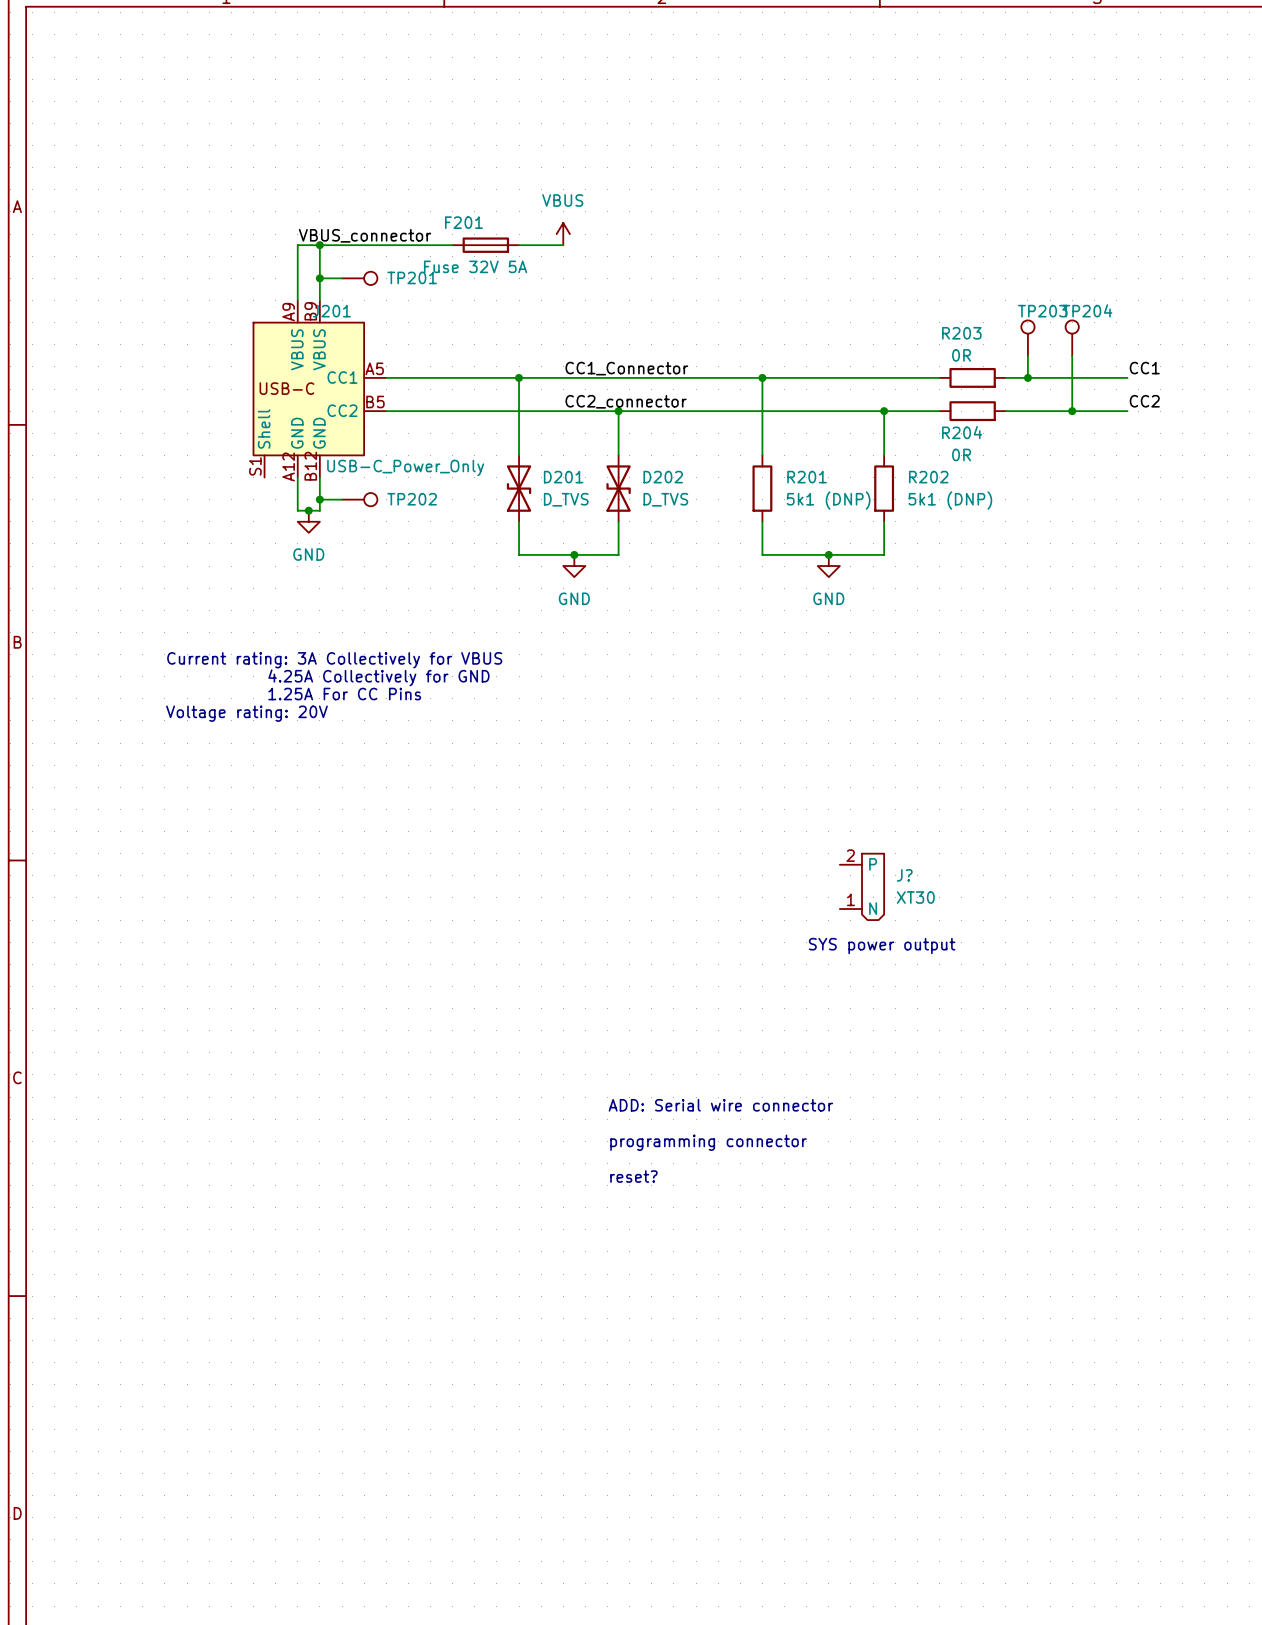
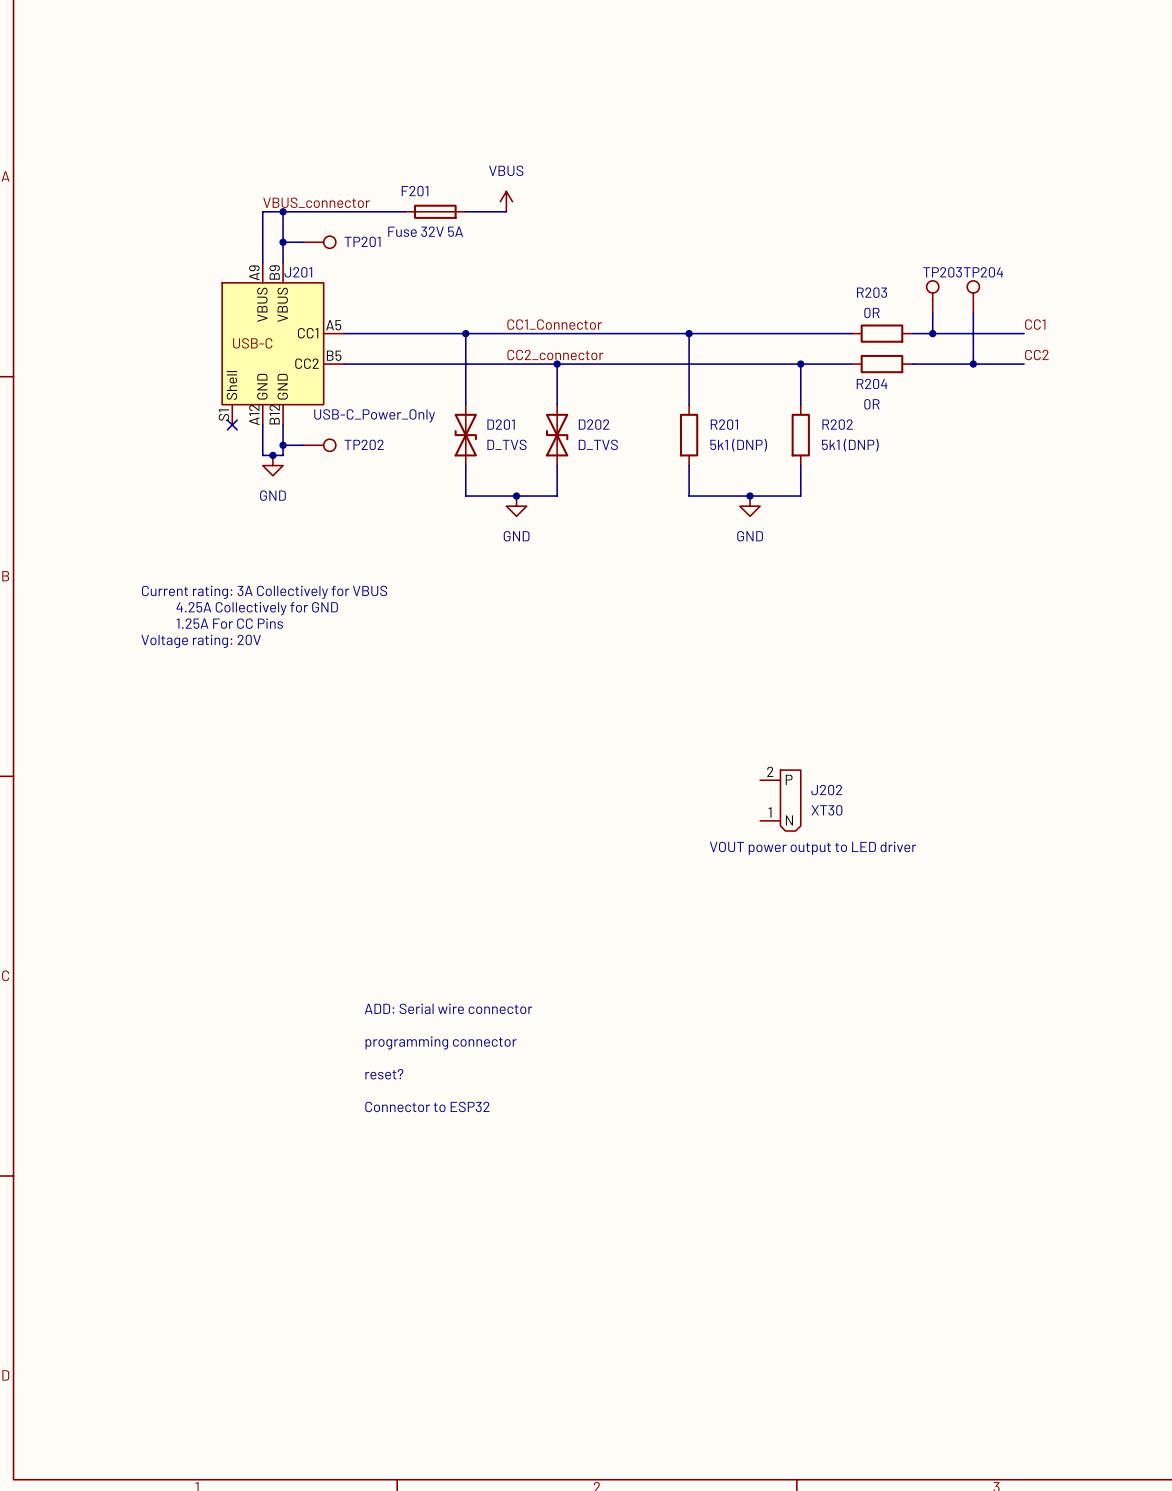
no-connect mark: none -> (232, 424)
J? name: J? (904, 875) -> J202 (826, 790)
text: none -> VOUT power output to LED driver (813, 848)
text: SYS power output (882, 946) -> none
text position: ADD: Serial wire connector (720, 1105) -> ADD: Serial wire connector (448, 1008)
text position: programming connector (708, 1142) -> programming connector (441, 1042)
text position: reset? (633, 1176) -> reset? (384, 1074)
text: none -> Connector to ESP32 (427, 1106)

